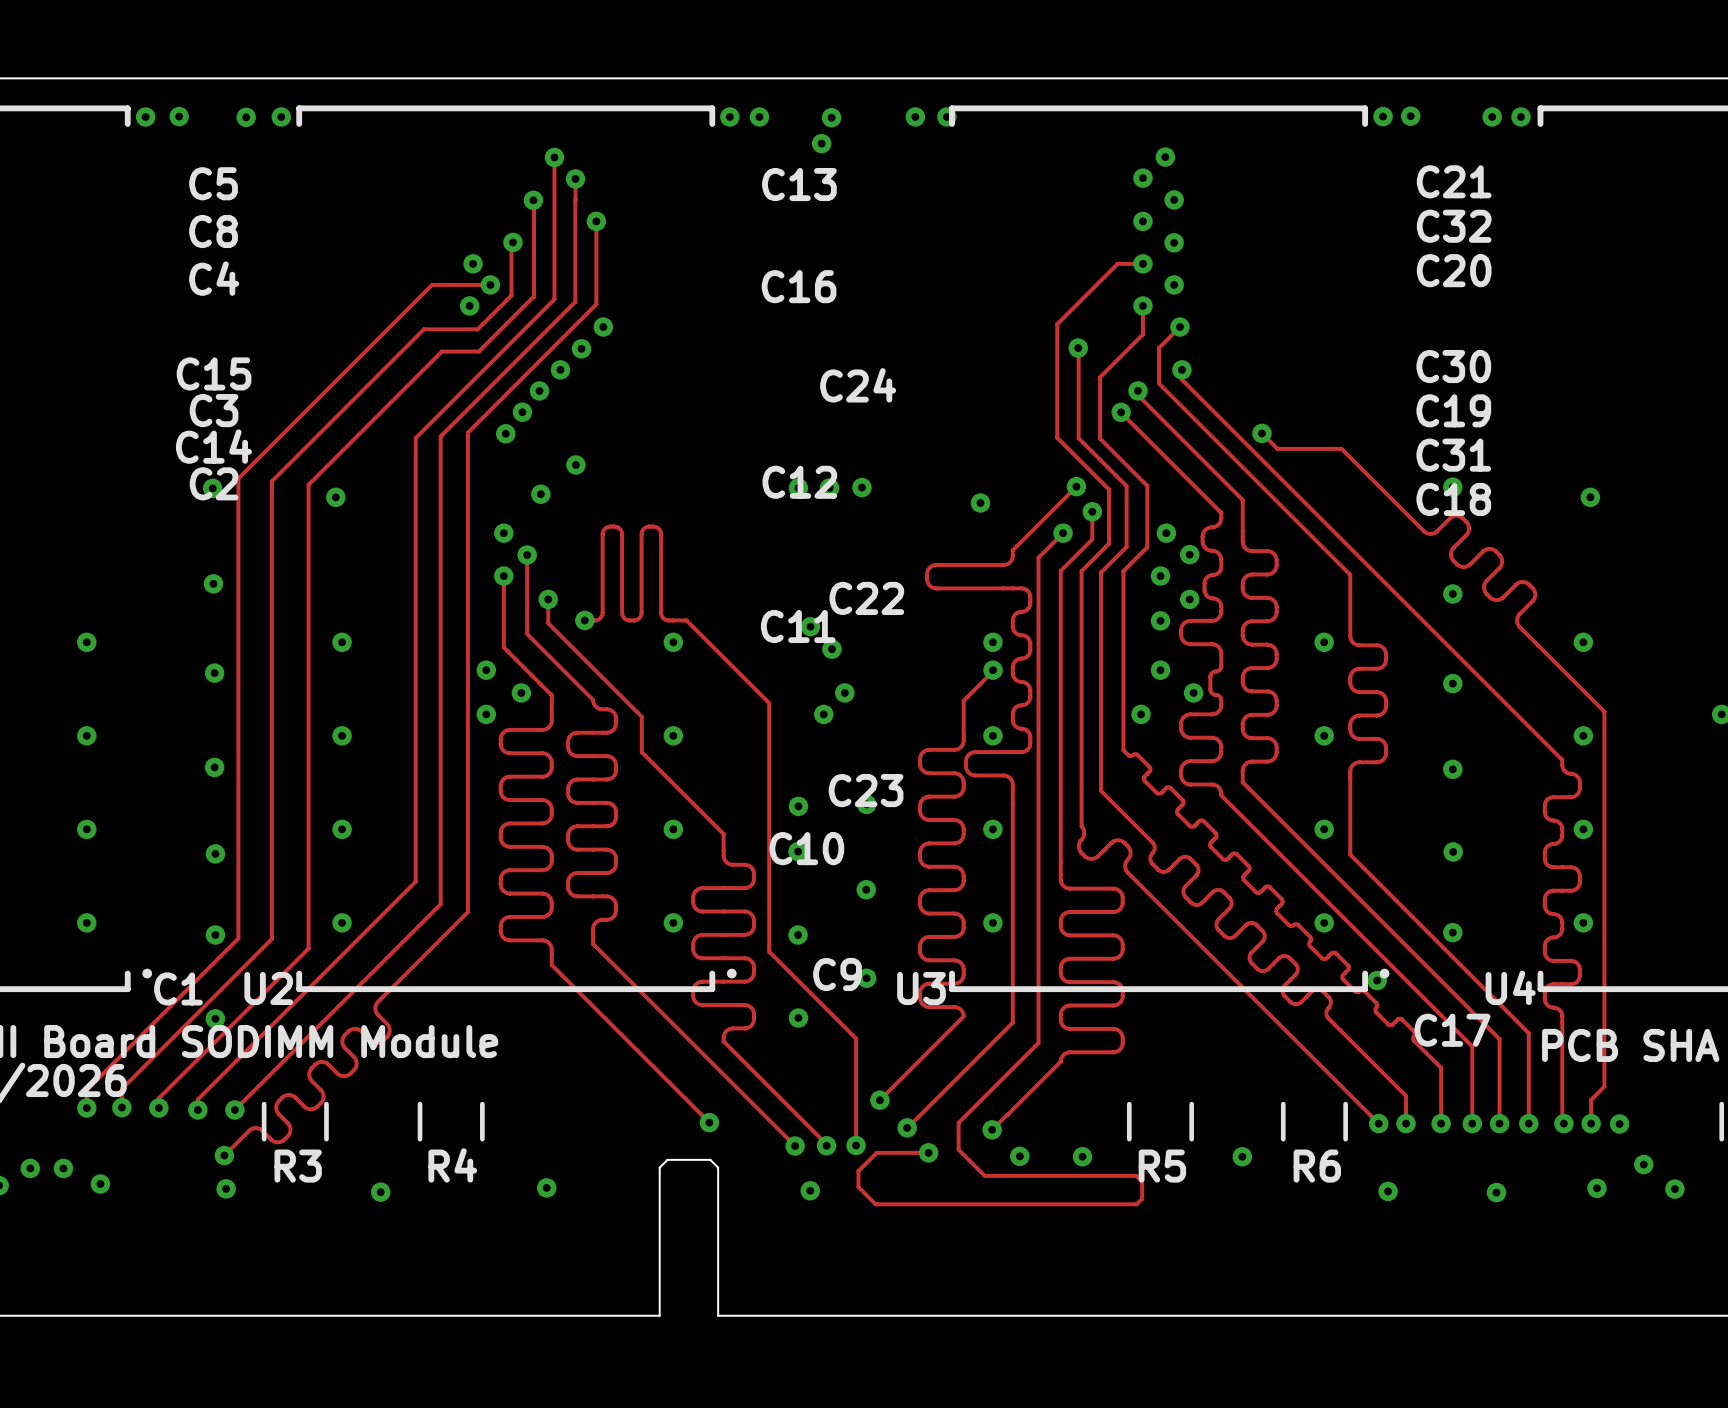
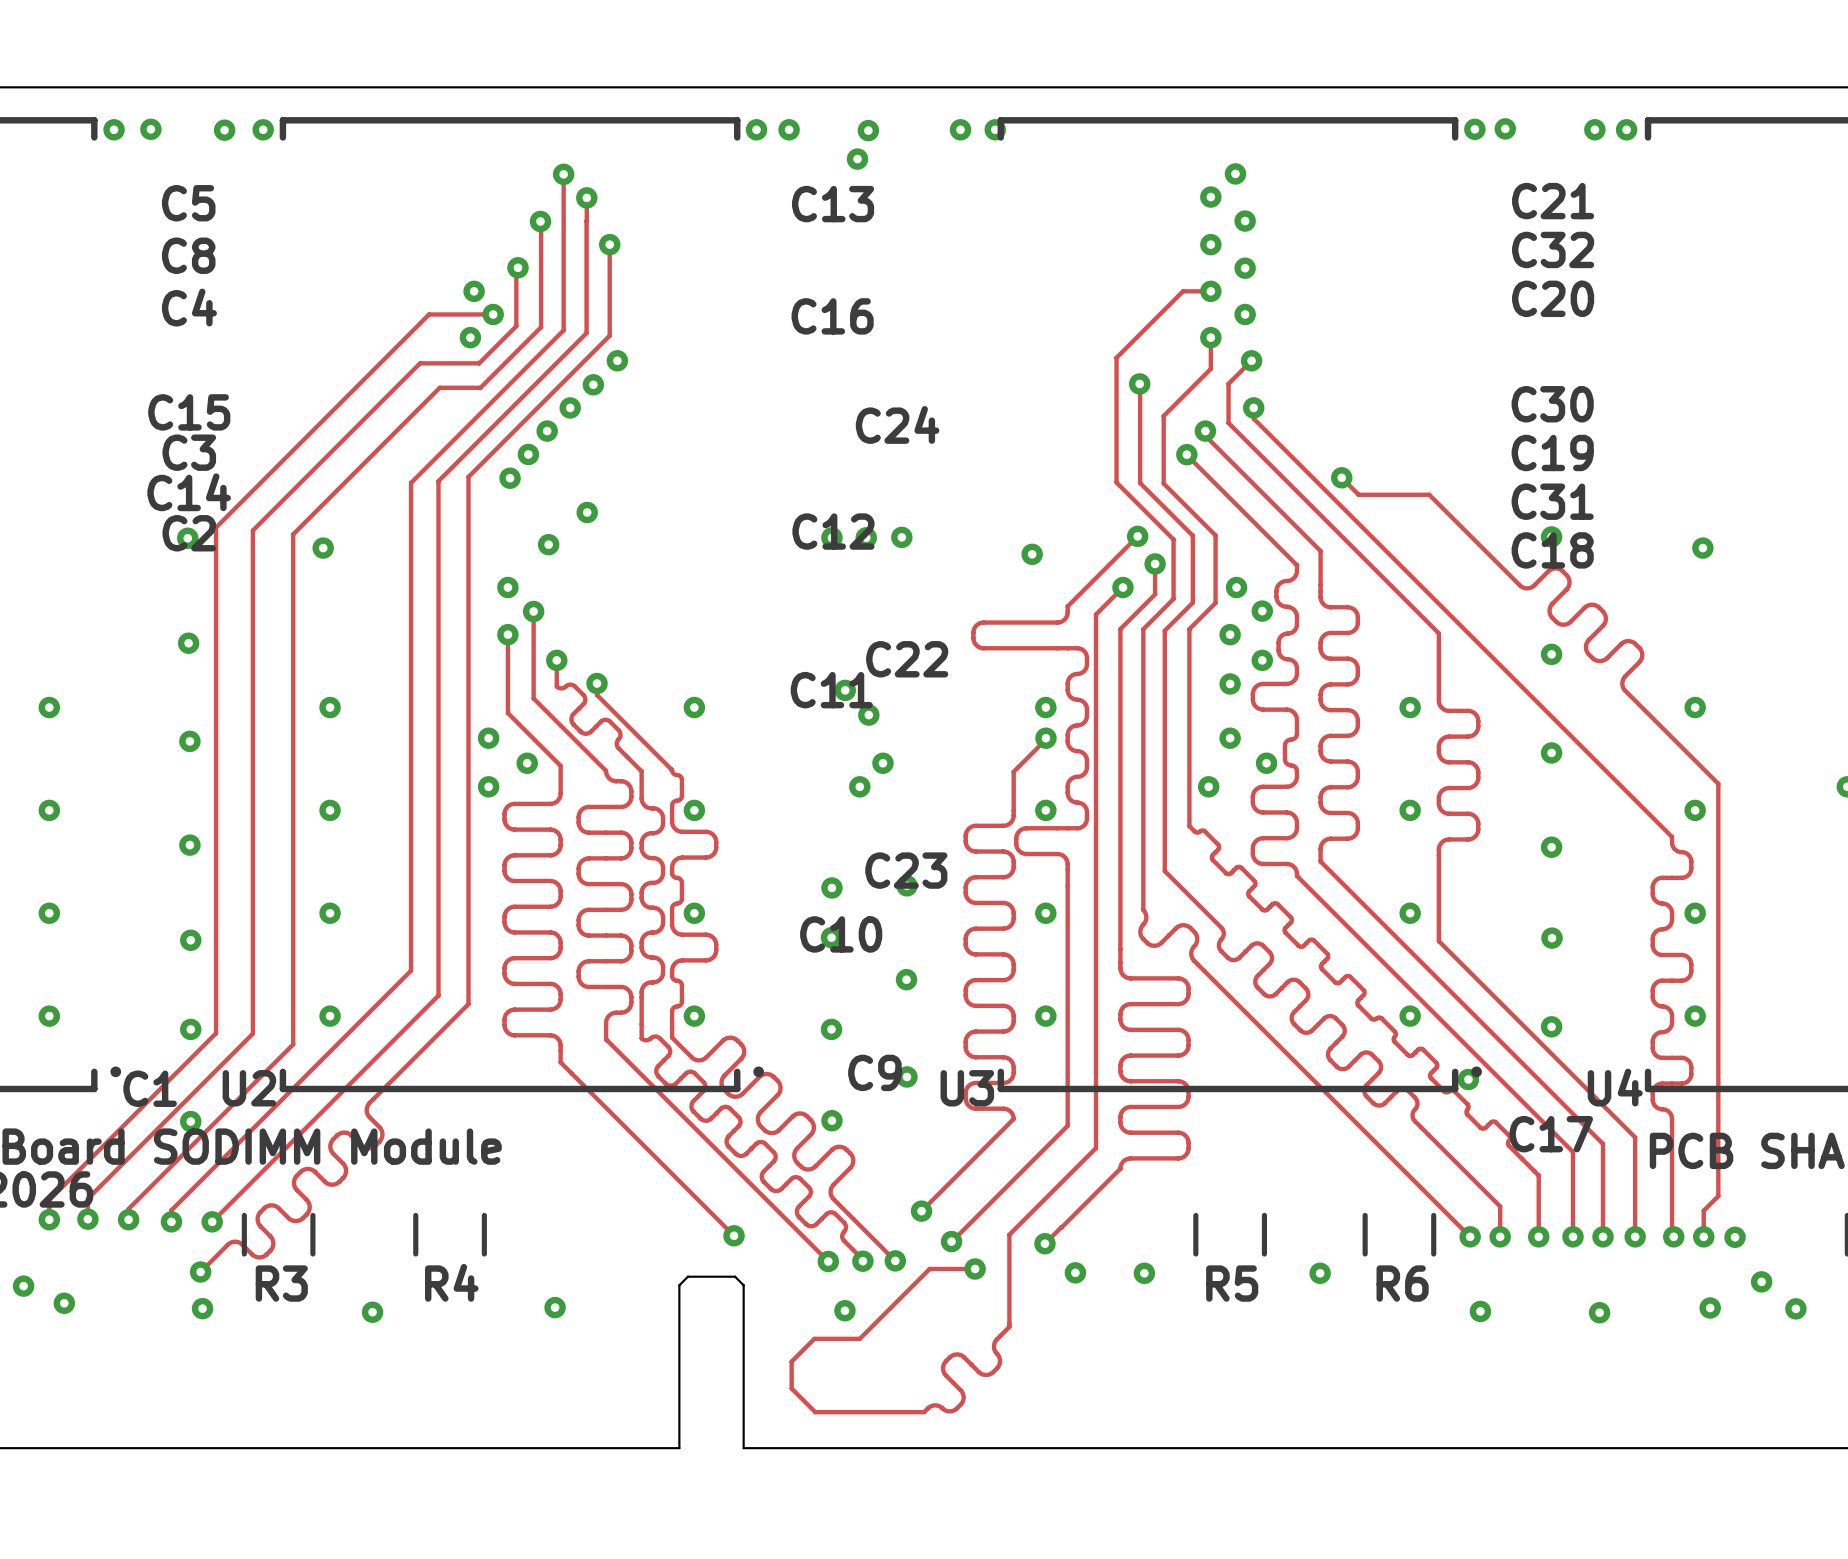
track: (584, 620) (596, 620) (602, 614) (602, 533) (604, 528) (610, 526) (618, 527) (622, 533) (622, 614) (628, 620) (635, 620) (639, 617) (641, 612) (641, 533) (646, 527) (656, 527) (661, 534) (662, 616) (667, 620) (686, 620) (769, 703) (769, 951) (856, 1038) (856, 1145) -> (597, 683) (597, 695) (673, 773) (681, 777) (681, 797) (672, 805) (672, 822) (674, 827) (681, 831) (708, 832) (713, 834) (715, 839) (715, 849) (711, 855) (680, 857) (675, 860) (672, 865) (672, 875) (680, 878) (681, 882) (681, 900) (672, 907) (673, 928) (680, 934) (710, 935) (715, 941) (716, 950) (714, 955) (709, 959) (680, 960) (673, 966) (672, 977) (681, 984) (681, 1001) (680, 1005) (672, 1010) (672, 1037) (692, 1058) (699, 1060) (705, 1058) (725, 1039) (731, 1037) (737, 1040) (743, 1047) (743, 1055) (723, 1076) (721, 1081) (723, 1089) (731, 1095) (741, 1094) (762, 1074) (769, 1074) (773, 1077) (779, 1084) (780, 1090) (759, 1114) (759, 1124) (766, 1131) (773, 1133) (778, 1130) (796, 1114) (801, 1113) (807, 1116) (813, 1123) (813, 1130) (796, 1149) (794, 1155) (796, 1161) (805, 1169) (814, 1167) (835, 1147) (843, 1147) (850, 1153) (853, 1159) (852, 1164) (832, 1185) (831, 1195) (895, 1260)
track: (548, 623) (604, 679) -> (556, 686) (562, 688) (572, 685) (584, 696) (584, 702) (571, 718) (572, 723) (580, 731) (588, 733) (602, 720) (608, 720) (620, 732) (616, 743) (618, 748)
track: (625, 700) (641, 716) (641, 752) (723, 834) (723, 856) (726, 861) (731, 864) (747, 865) (753, 872) (753, 881) (747, 887) (701, 888) (694, 893) (693, 904) (698, 910) (746, 911) (751, 915) (754, 920) (753, 929) (746, 934) (697, 936) (693, 943) (695, 954) (701, 958) (747, 958) (753, 963) (754, 972) (751, 978) (746, 981) (698, 982) (693, 988) (694, 999) (701, 1004) (745, 1005) (751, 1007) (754, 1014) (751, 1024) (746, 1028) (727, 1029) (724, 1034) (723, 1041) (809, 1127) -> (641, 771) (642, 802) (647, 807) (659, 810) (663, 818) (660, 829) (645, 835) (641, 843) (644, 855) (658, 859) (663, 866) (660, 879) (645, 885) (641, 892) (644, 904) (658, 909) (663, 916) (660, 928) (645, 934) (641, 942) (644, 954) (658, 959) (663, 966) (660, 978) (646, 983) (641, 991) (641, 1038) (646, 1040) (657, 1036) (670, 1050) (668, 1055) (657, 1067) (656, 1074) (666, 1084) (670, 1085) (675, 1084) (687, 1072) (694, 1073) (705, 1086) (692, 1103) (693, 1111) (701, 1119) (706, 1120) (722, 1107) (729, 1108) (740, 1121) (727, 1137) (728, 1146) (736, 1154) (742, 1155) (757, 1142) (764, 1143) (775, 1156) (762, 1172) (763, 1181) (771, 1189) (777, 1191) (792, 1178) (799, 1178) (810, 1192) (797, 1208) (798, 1216) (806, 1224) (812, 1226) (827, 1213) (834, 1213) (845, 1225) (842, 1235) (844, 1240)
track: (959, 1121) (958, 1149) (984, 1175) (1136, 1175) (1142, 1181) (1142, 1198) (1136, 1204) (875, 1204) (858, 1187) (858, 1171) (876, 1152) (887, 1152) -> (1009, 1234) (1009, 1326) (994, 1344) (994, 1349) (999, 1358) (999, 1364) (992, 1372) (986, 1375) (979, 1372) (960, 1355) (952, 1355) (946, 1361) (943, 1367) (944, 1373) (963, 1395) (962, 1401) (956, 1408) (948, 1411) (935, 1405) (930, 1406) (924, 1412) (815, 1412) (791, 1388) (791, 1361) (814, 1338) (859, 1338) (929, 1269)

